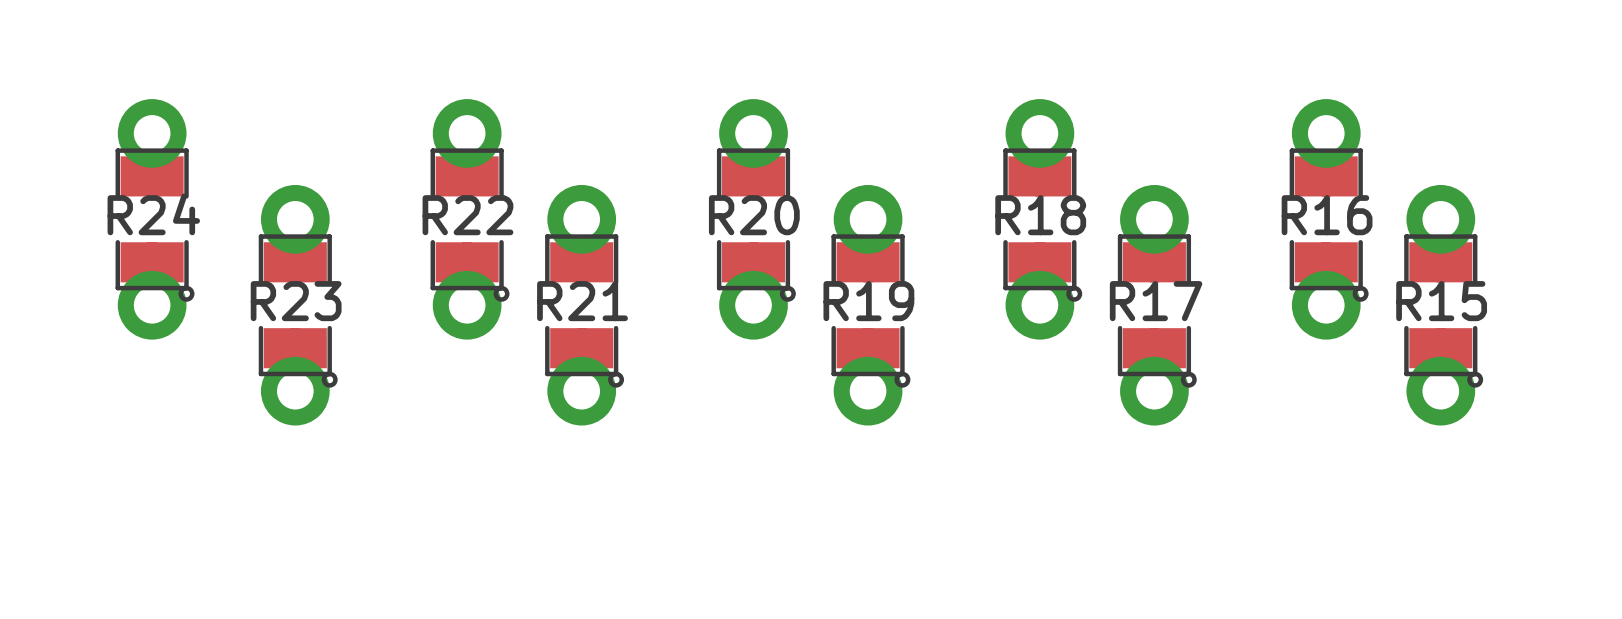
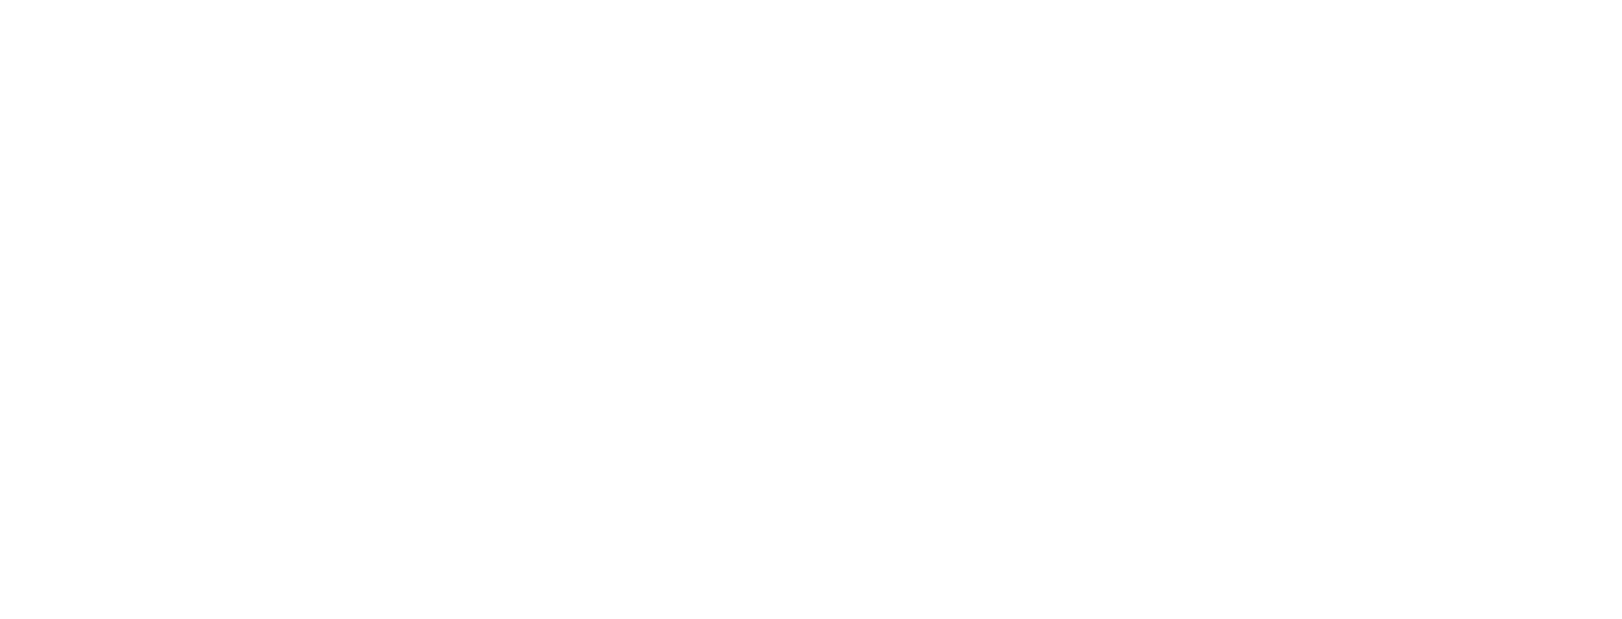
R24: (155, 219) -> none
R22: (470, 219) -> none
R20: (756, 219) -> none
R18: (1042, 219) -> none
R16: (1329, 219) -> none
R23: (298, 305) -> none
R21: (584, 305) -> none
R19: (870, 305) -> none
R17: (1157, 305) -> none
R15: (1443, 305) -> none

